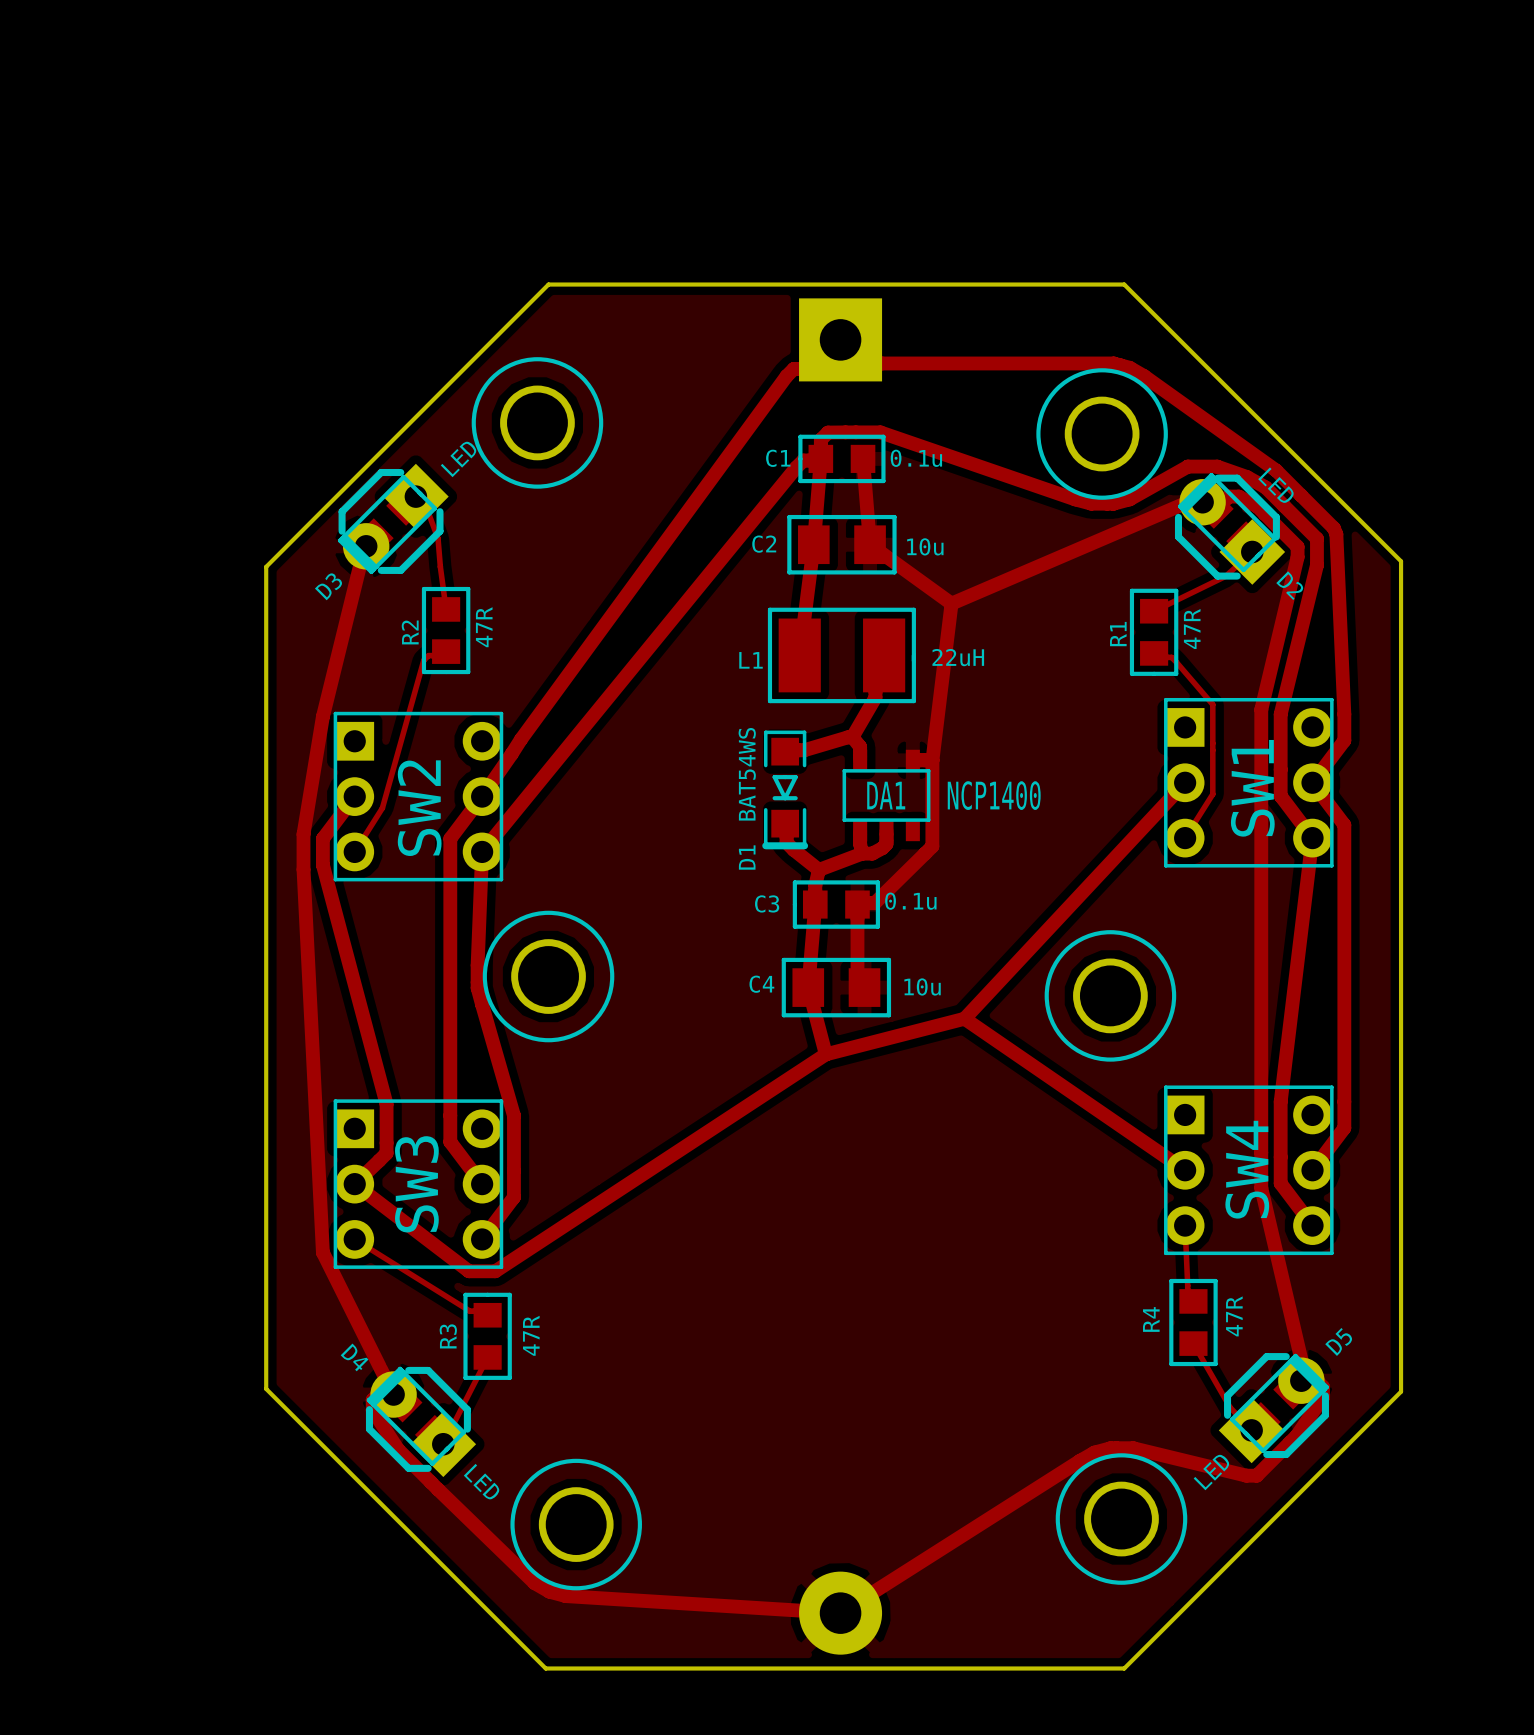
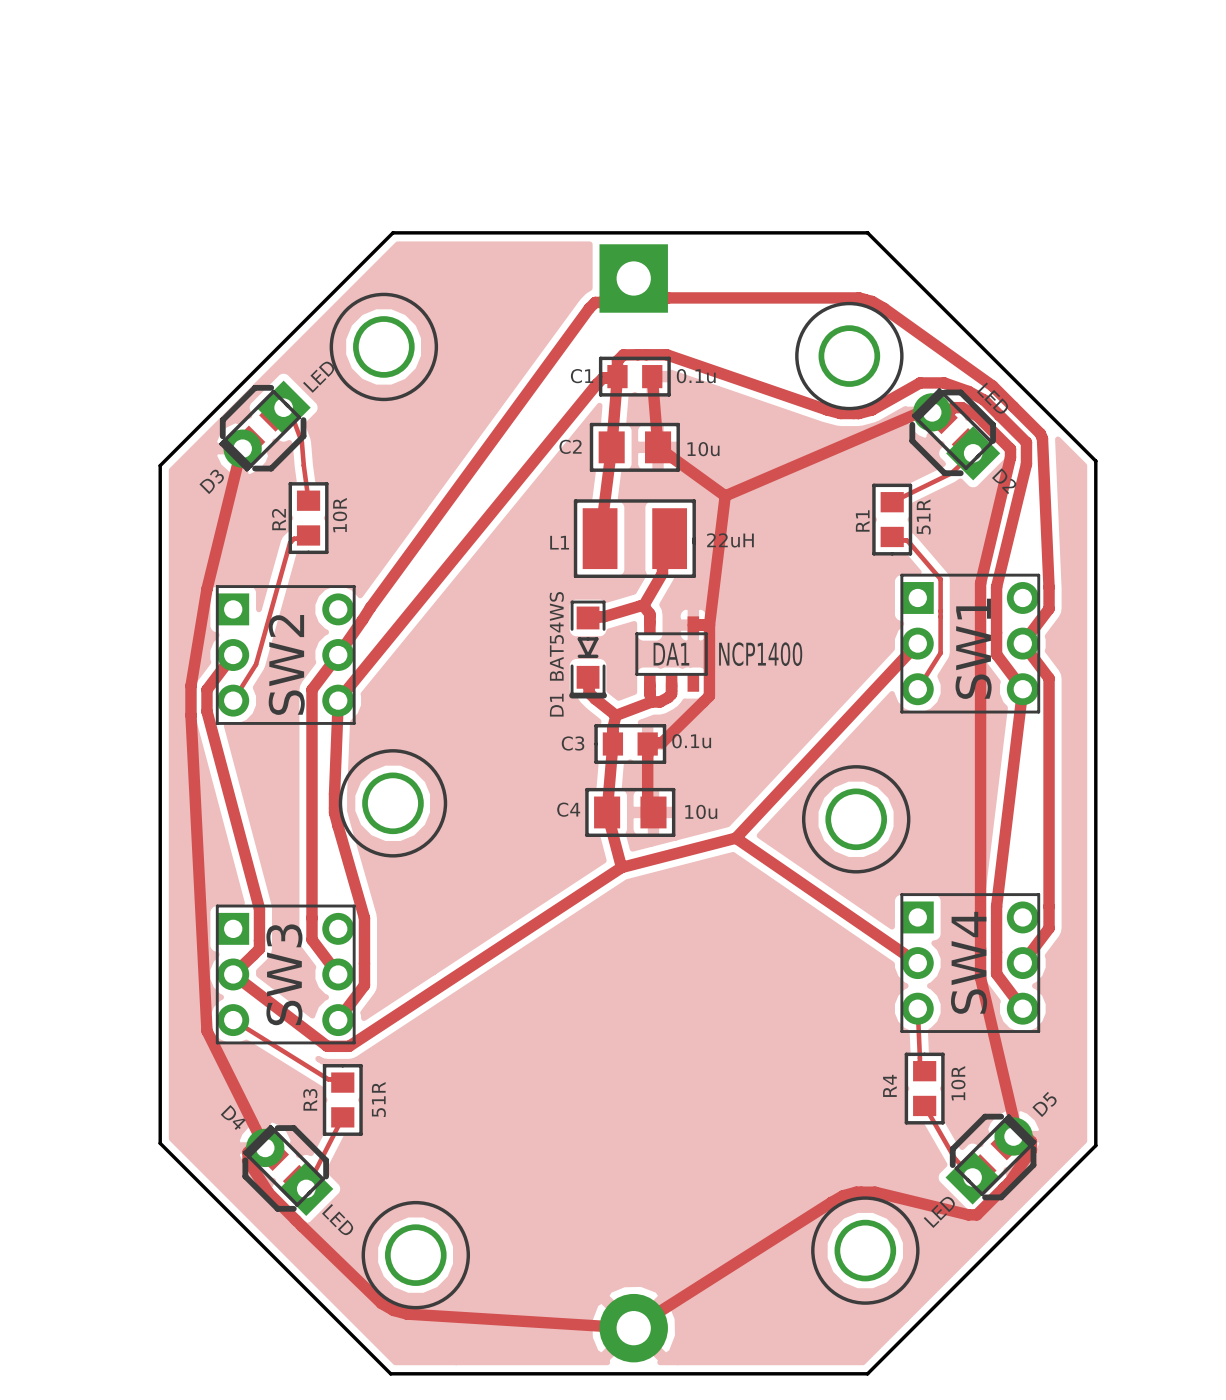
R2 value: 47R (484, 627) -> 10R (339, 515)
R1 value: 47R (1192, 629) -> 51R (923, 516)
R4 value: 47R (1234, 1316) -> 10R (958, 1083)
R3 value: 47R (531, 1335) -> 51R (378, 1099)

